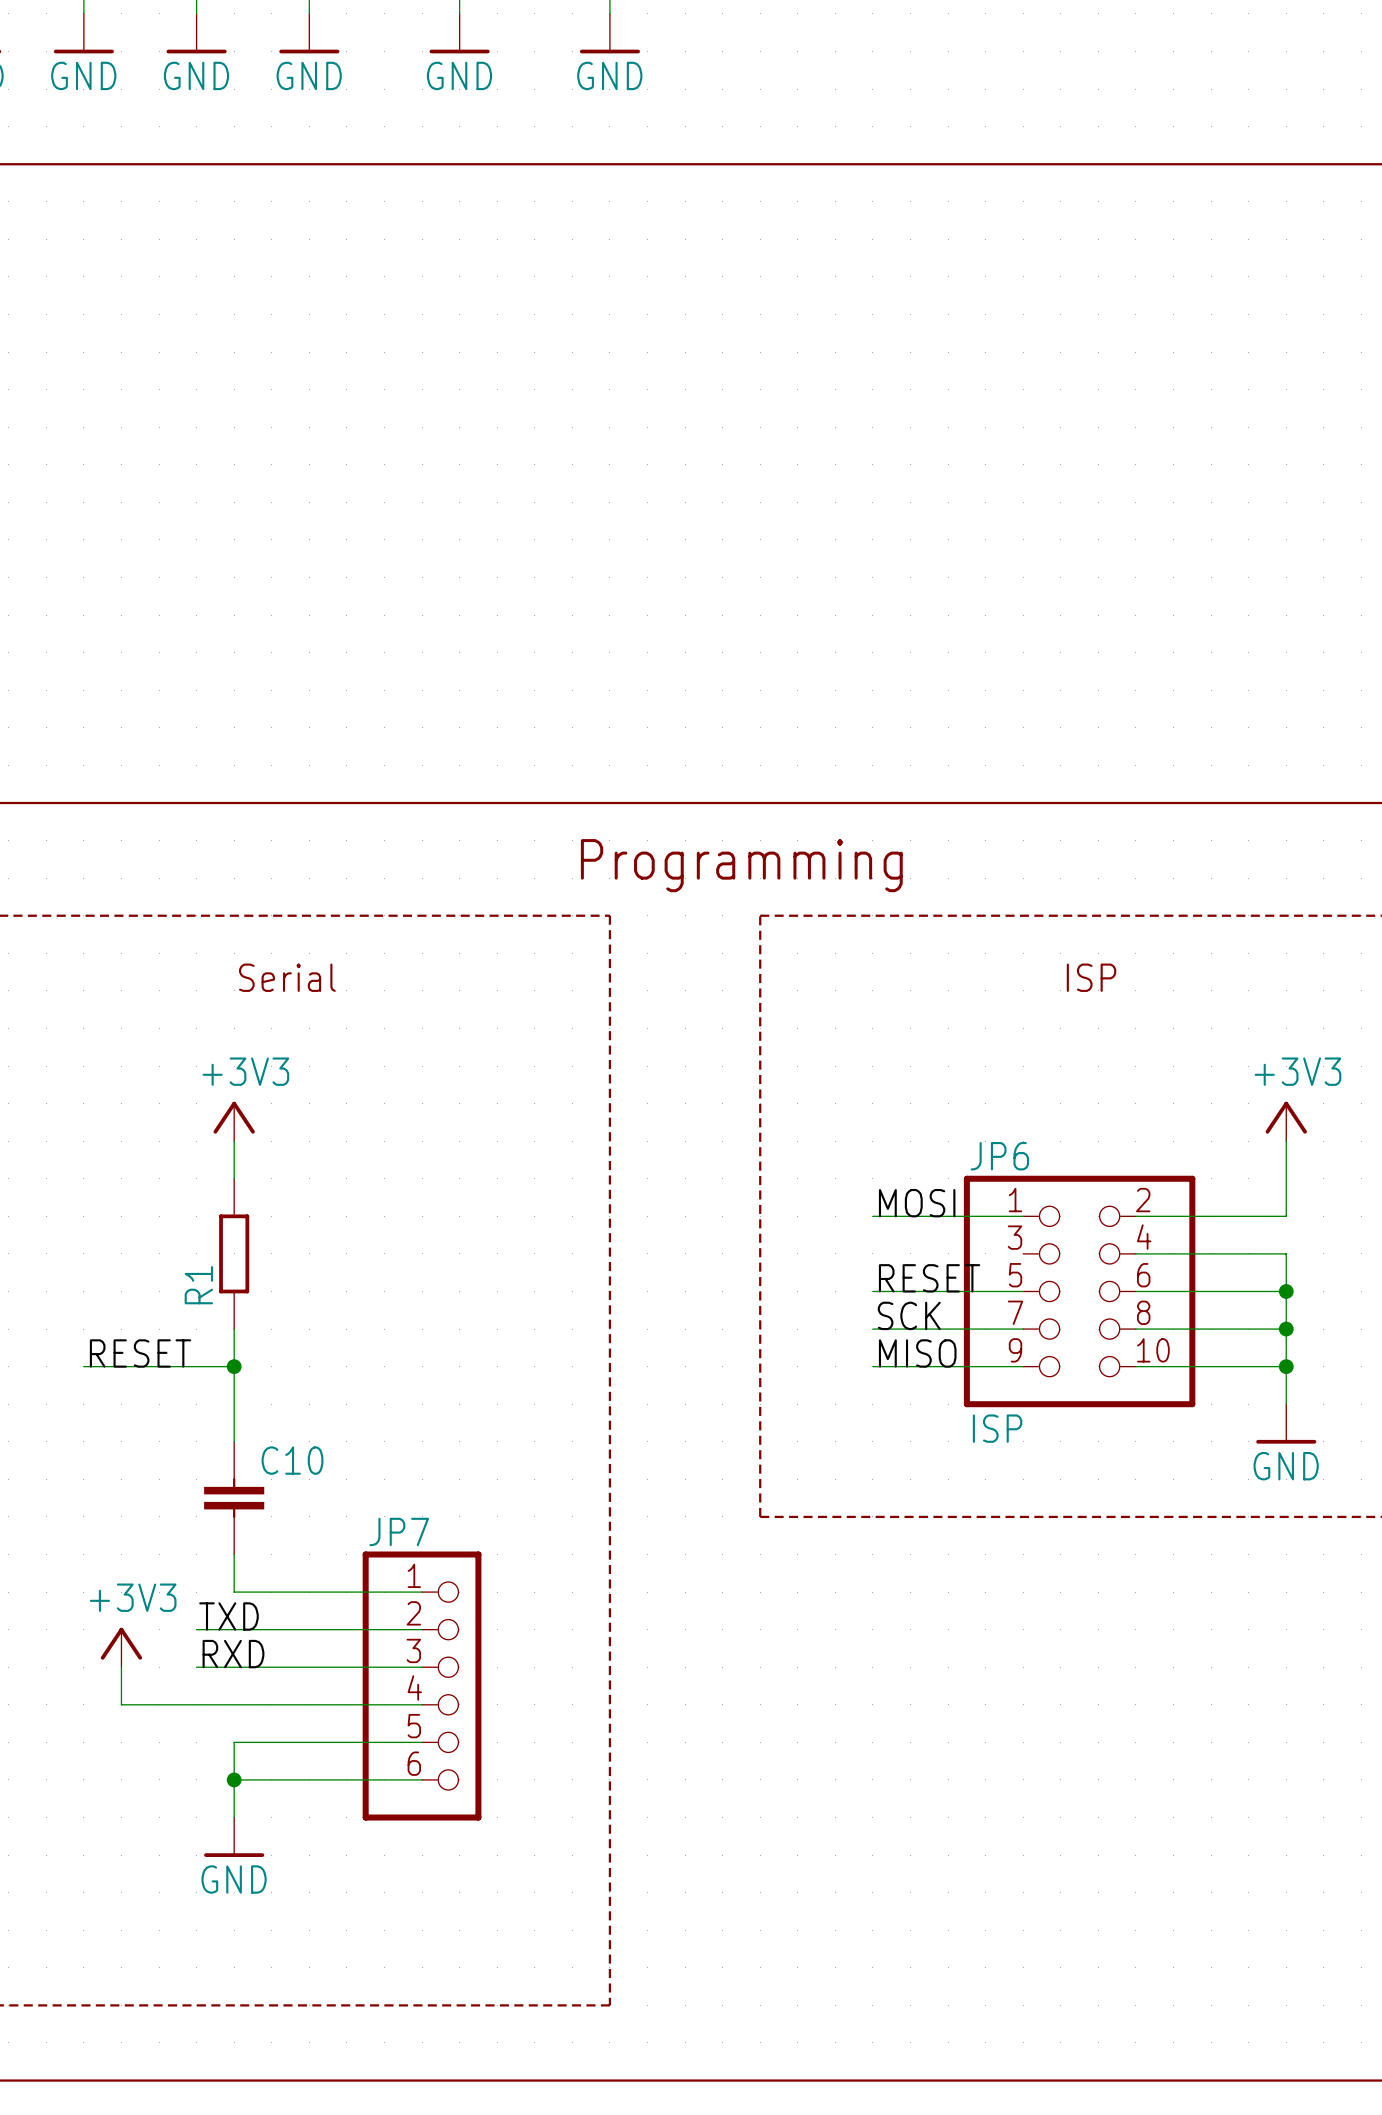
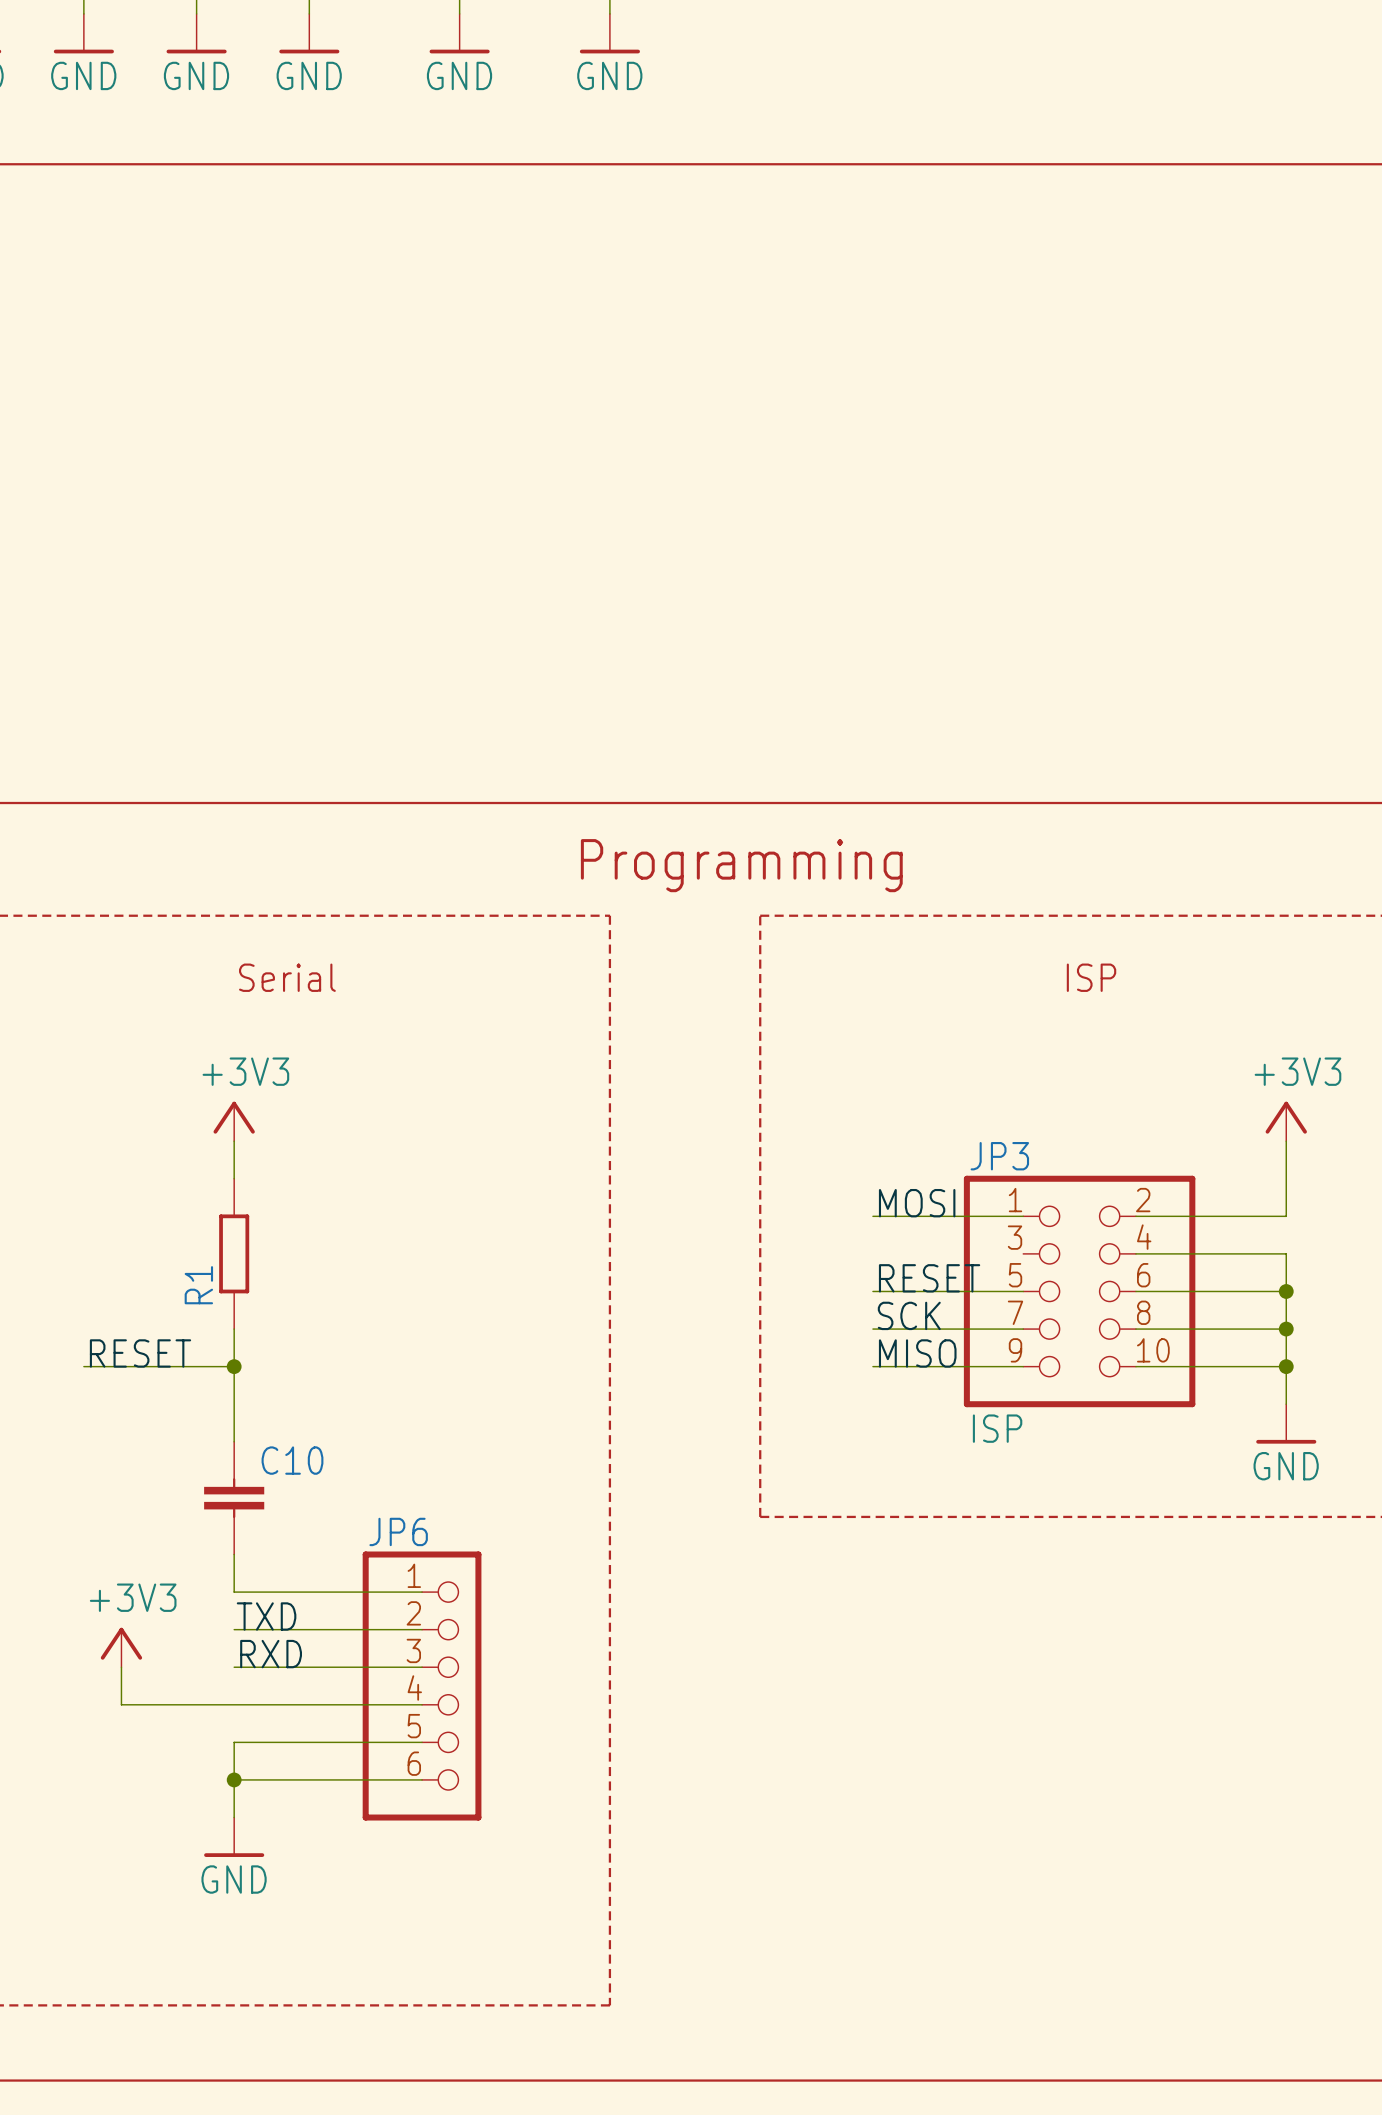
JP6 name: JP6 (999, 1156) -> JP3 (999, 1156)
JP7 name: JP7 (399, 1531) -> JP6 (398, 1531)
label position: TXD (228, 1616) -> TXD (266, 1616)
wire: (196, 1629) (234, 1629) -> none
label position: RXD (233, 1654) -> RXD (271, 1654)
wire: (196, 1667) (234, 1667) -> none

